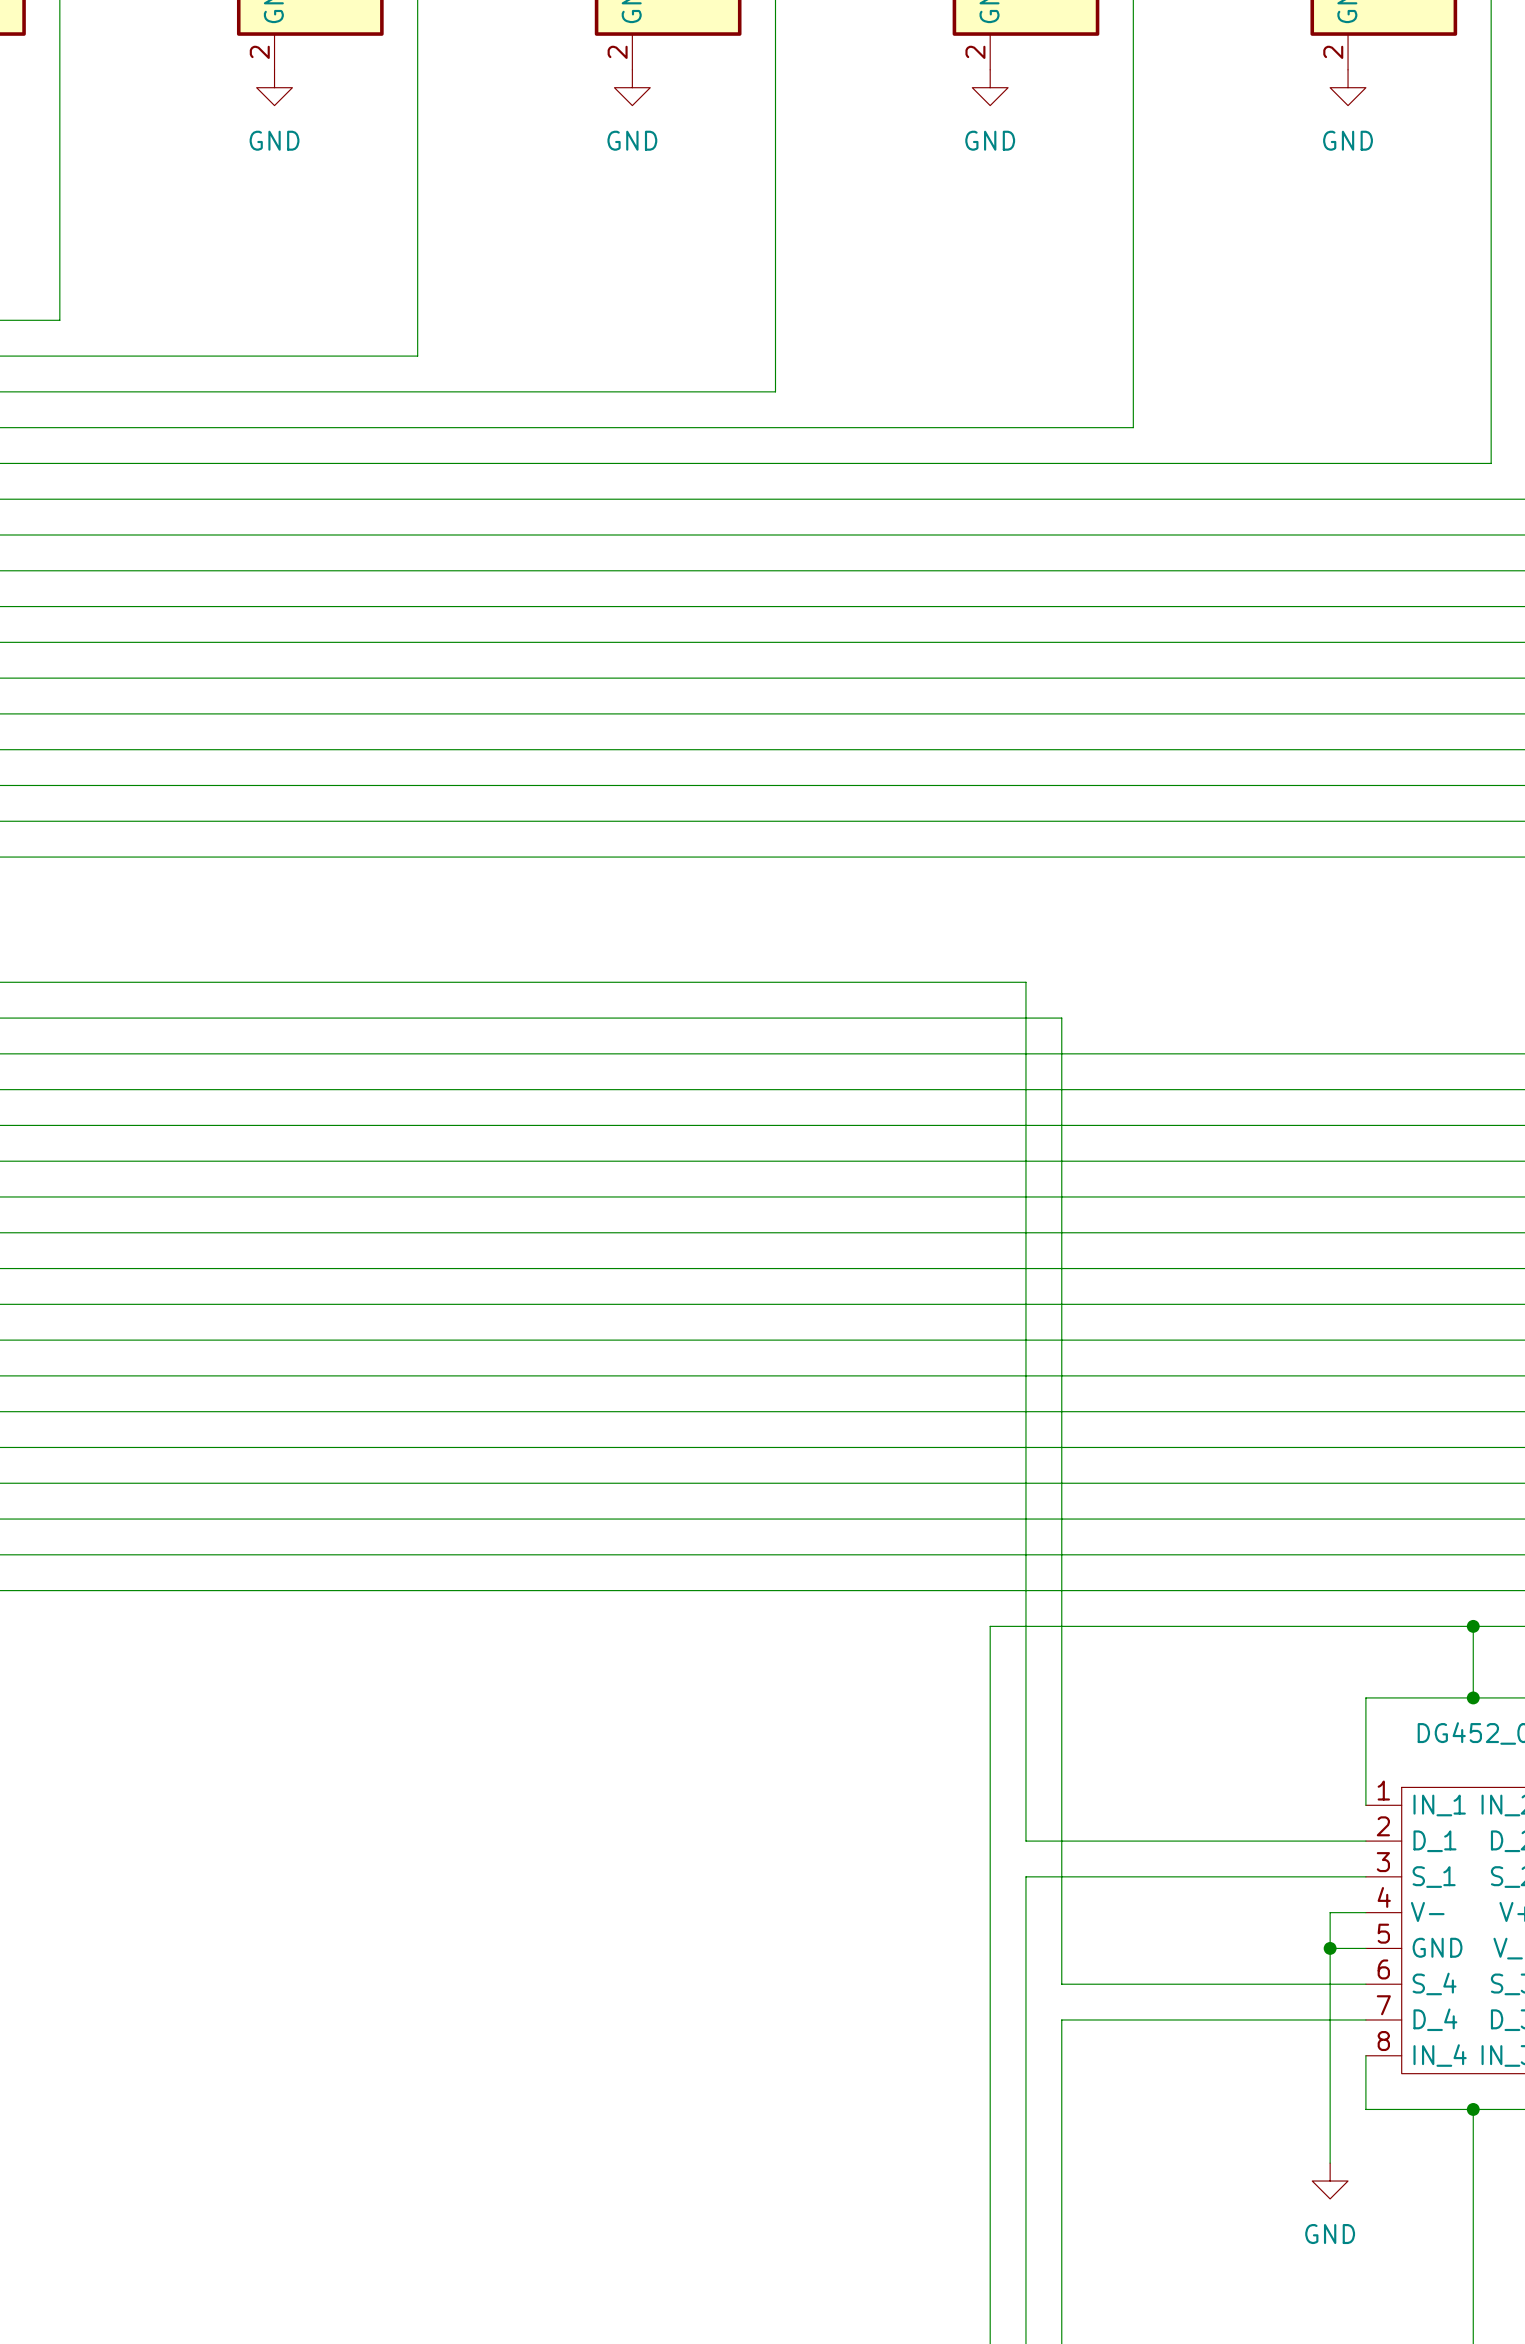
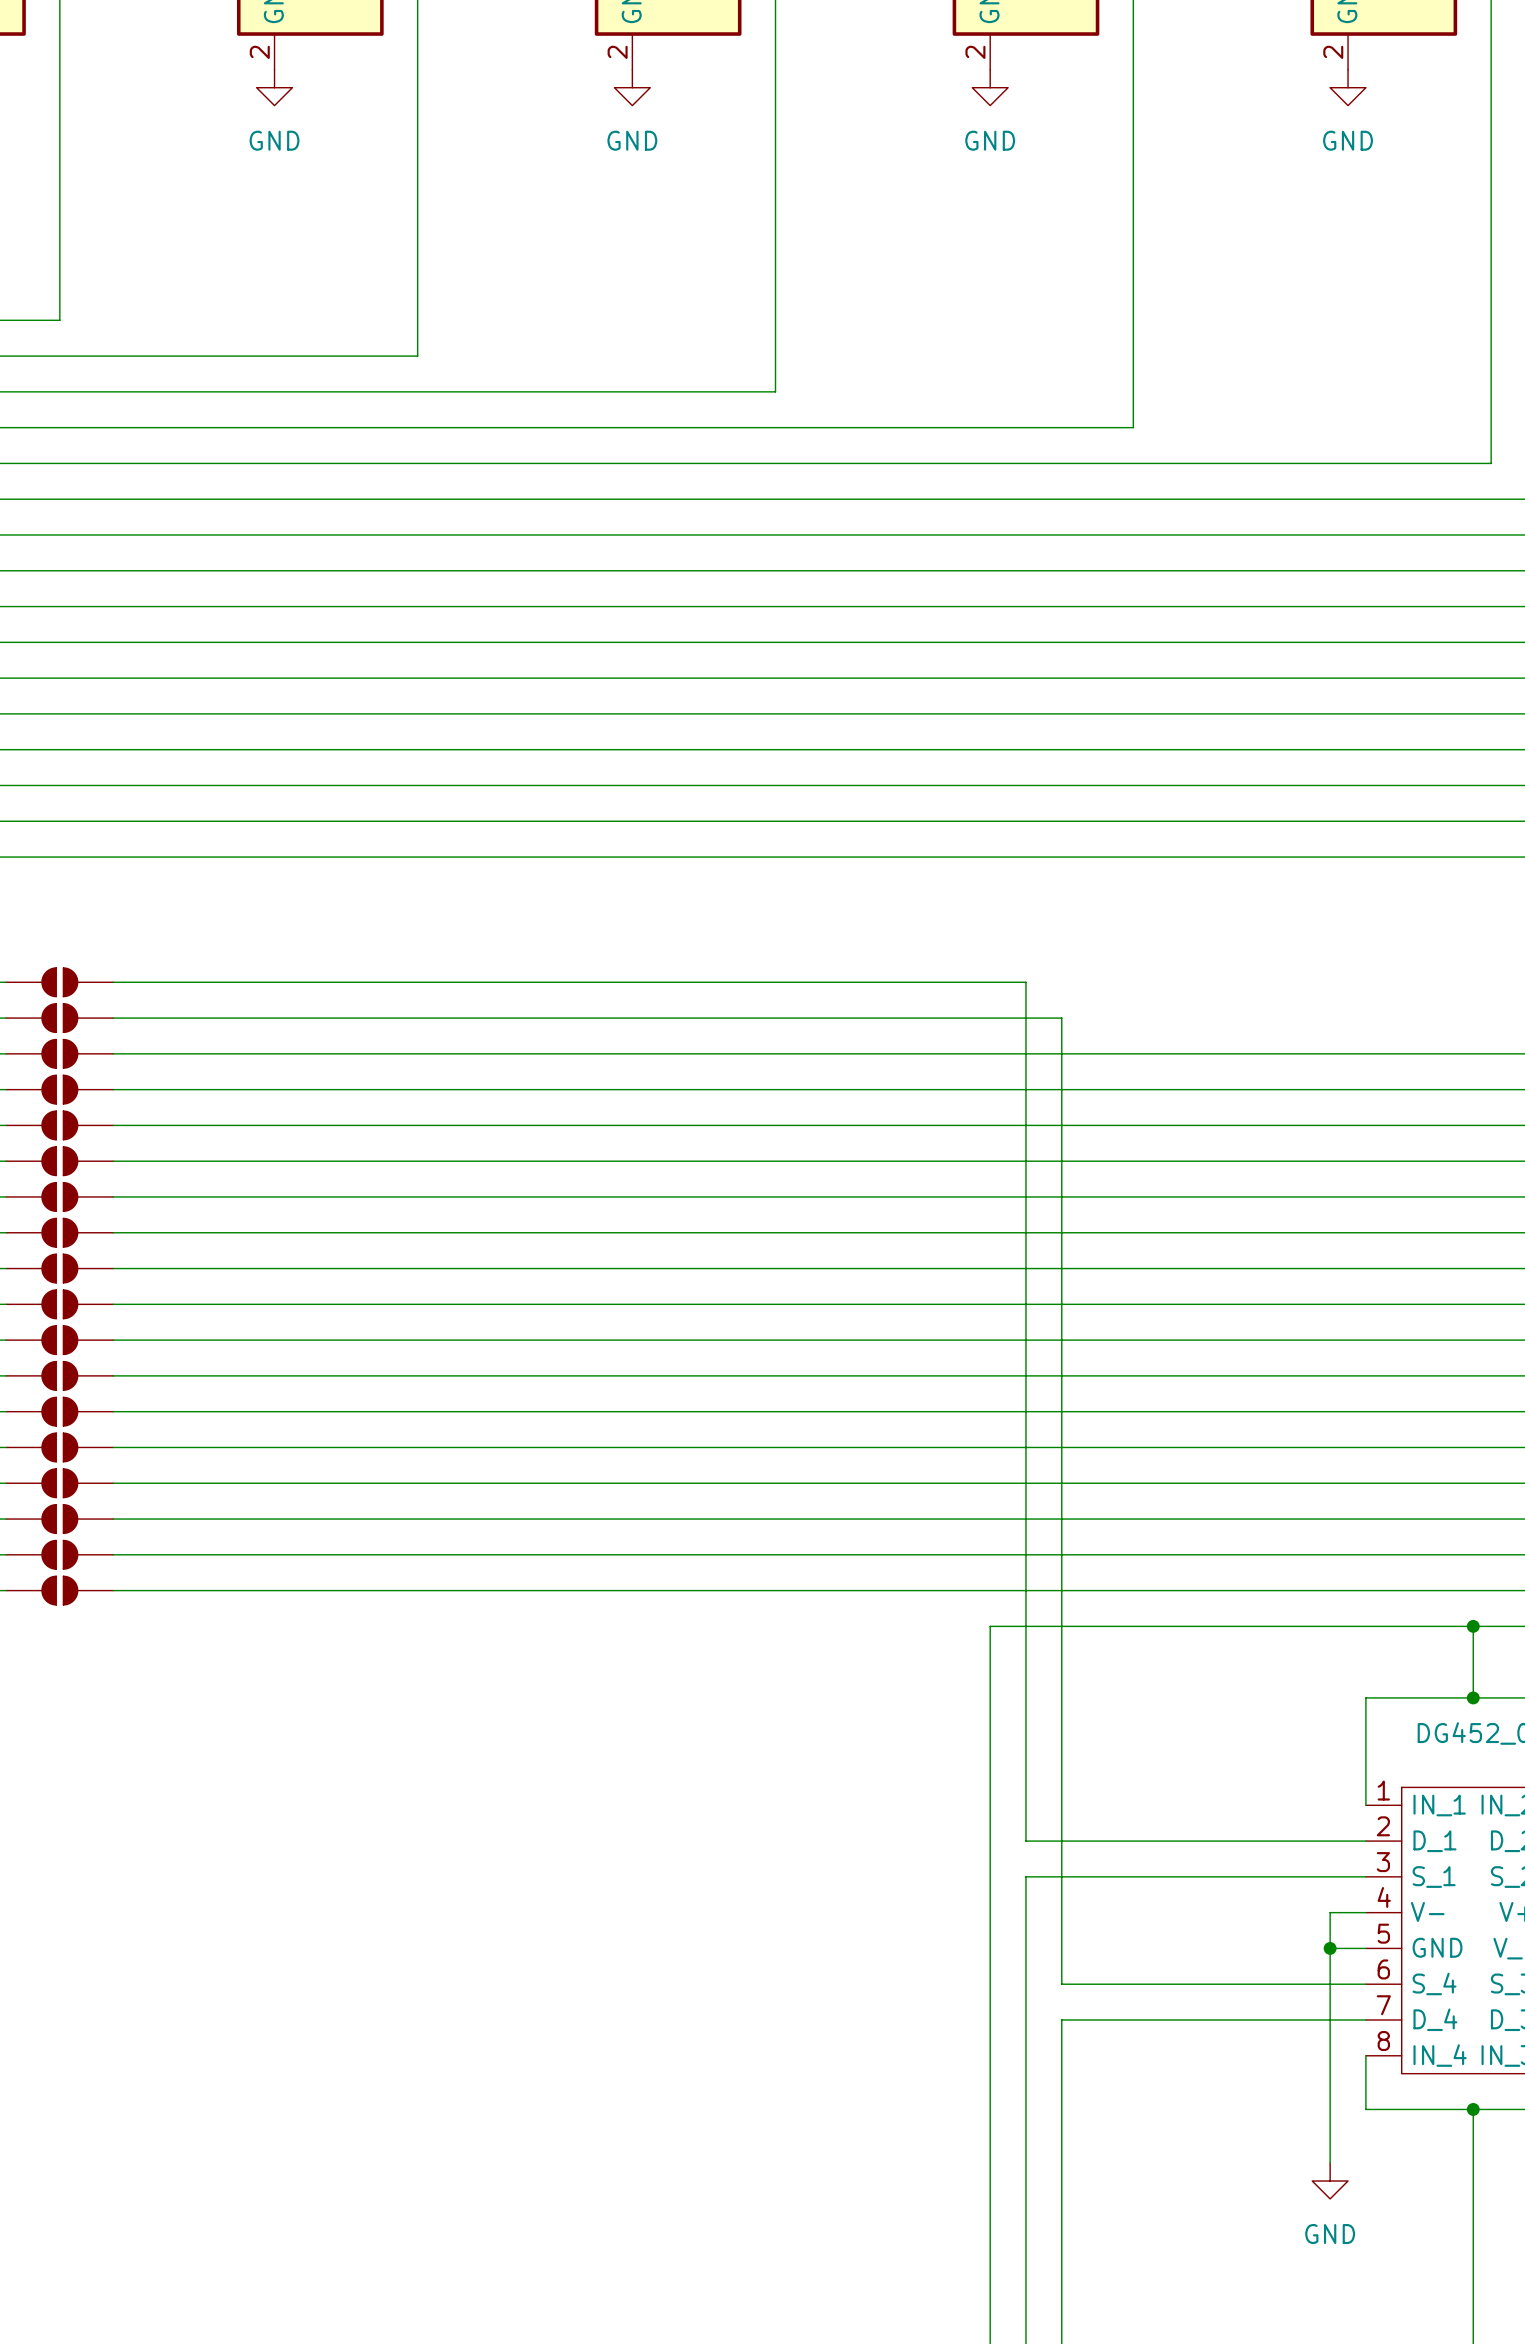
part: none -> (59, 982)
part: none -> (59, 1018)
part: none -> (59, 1053)
part: none -> (59, 1089)
part: none -> (59, 1125)
part: none -> (59, 1161)
part: none -> (59, 1196)
part: none -> (59, 1232)
part: none -> (59, 1268)
part: none -> (59, 1304)
part: none -> (59, 1340)
part: none -> (59, 1375)
part: none -> (59, 1411)
part: none -> (59, 1447)
part: none -> (59, 1483)
part: none -> (59, 1519)
part: none -> (59, 1554)
part: none -> (59, 1590)

